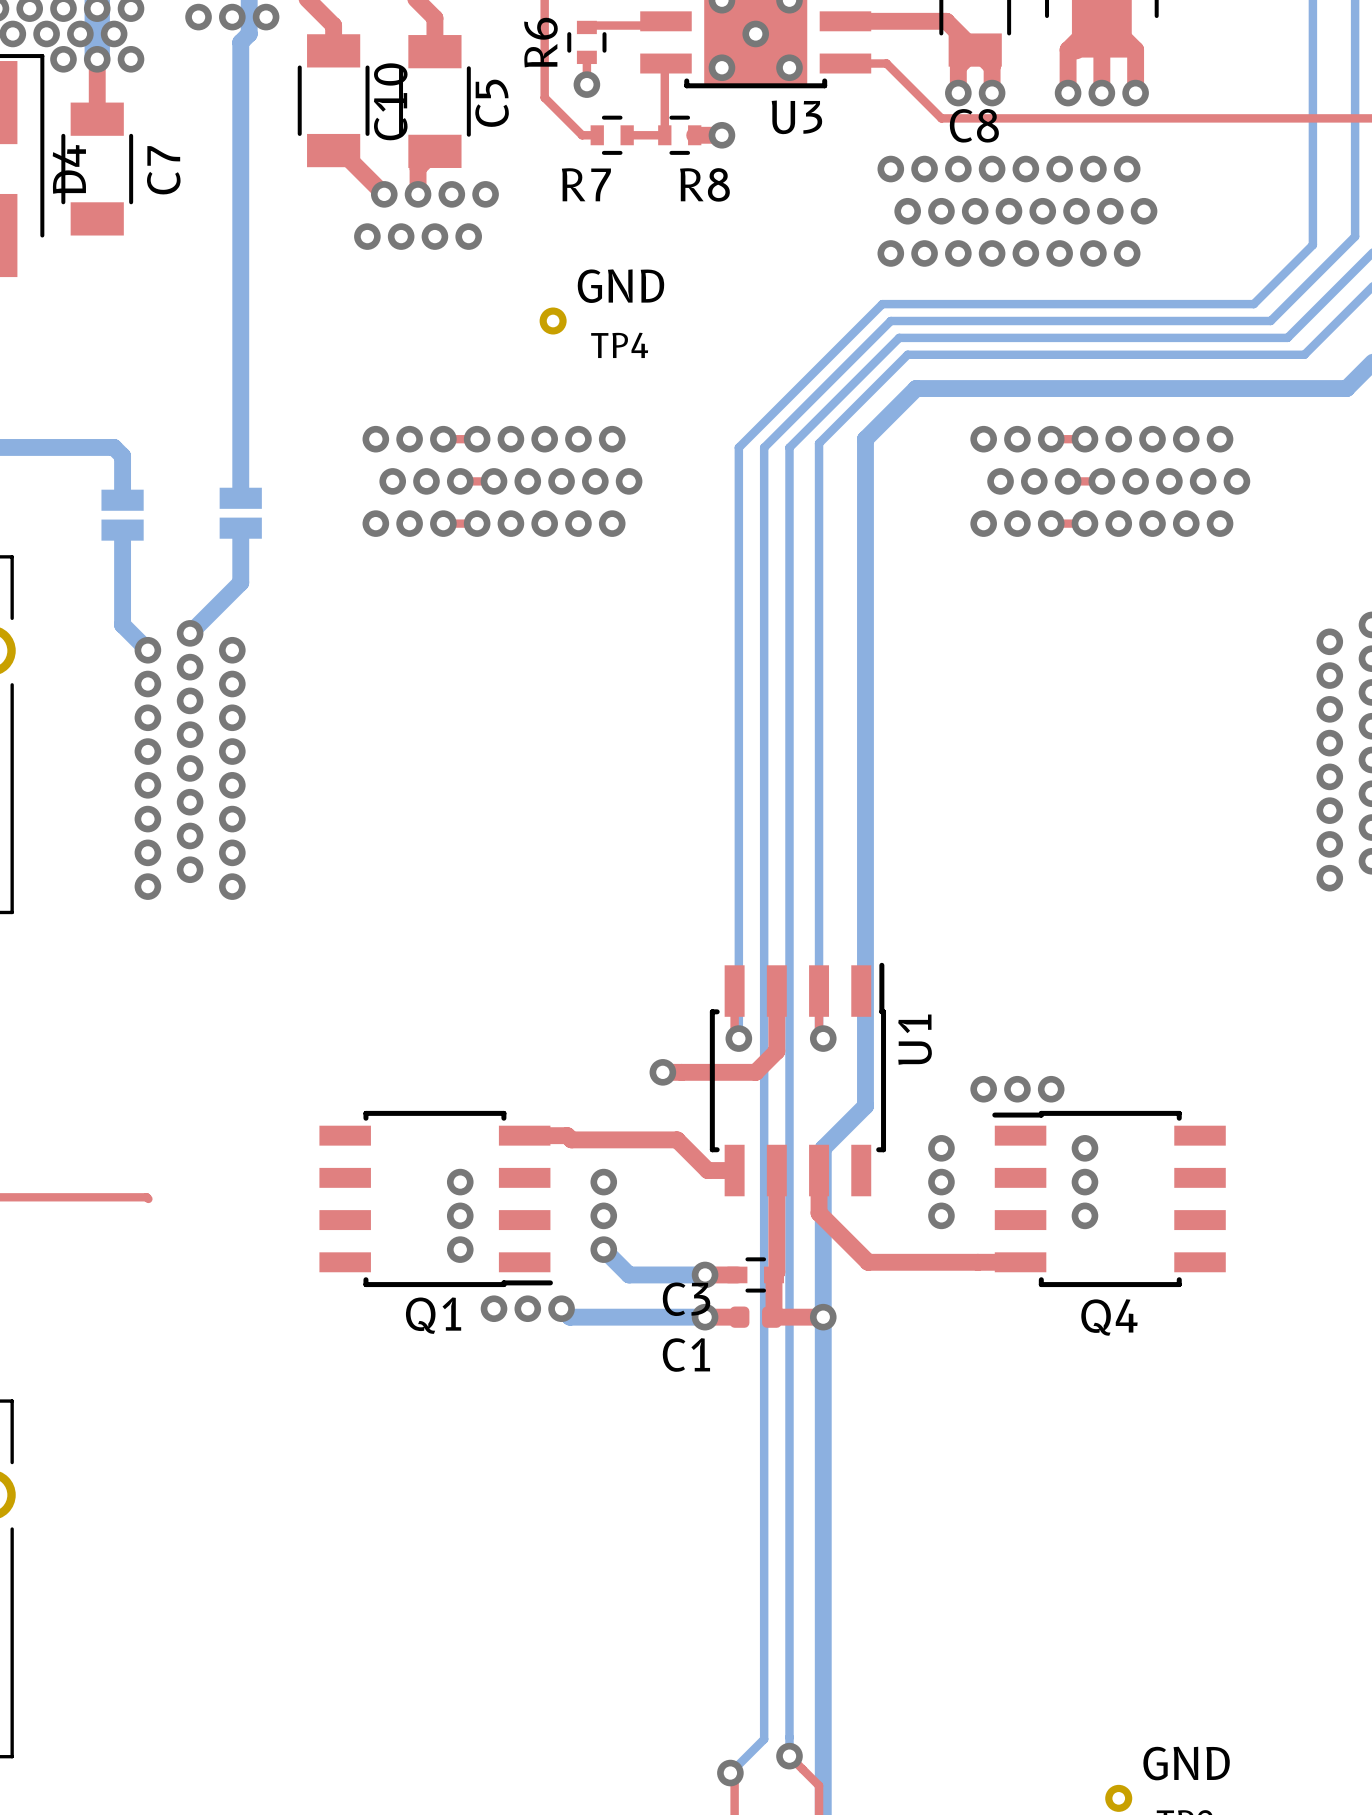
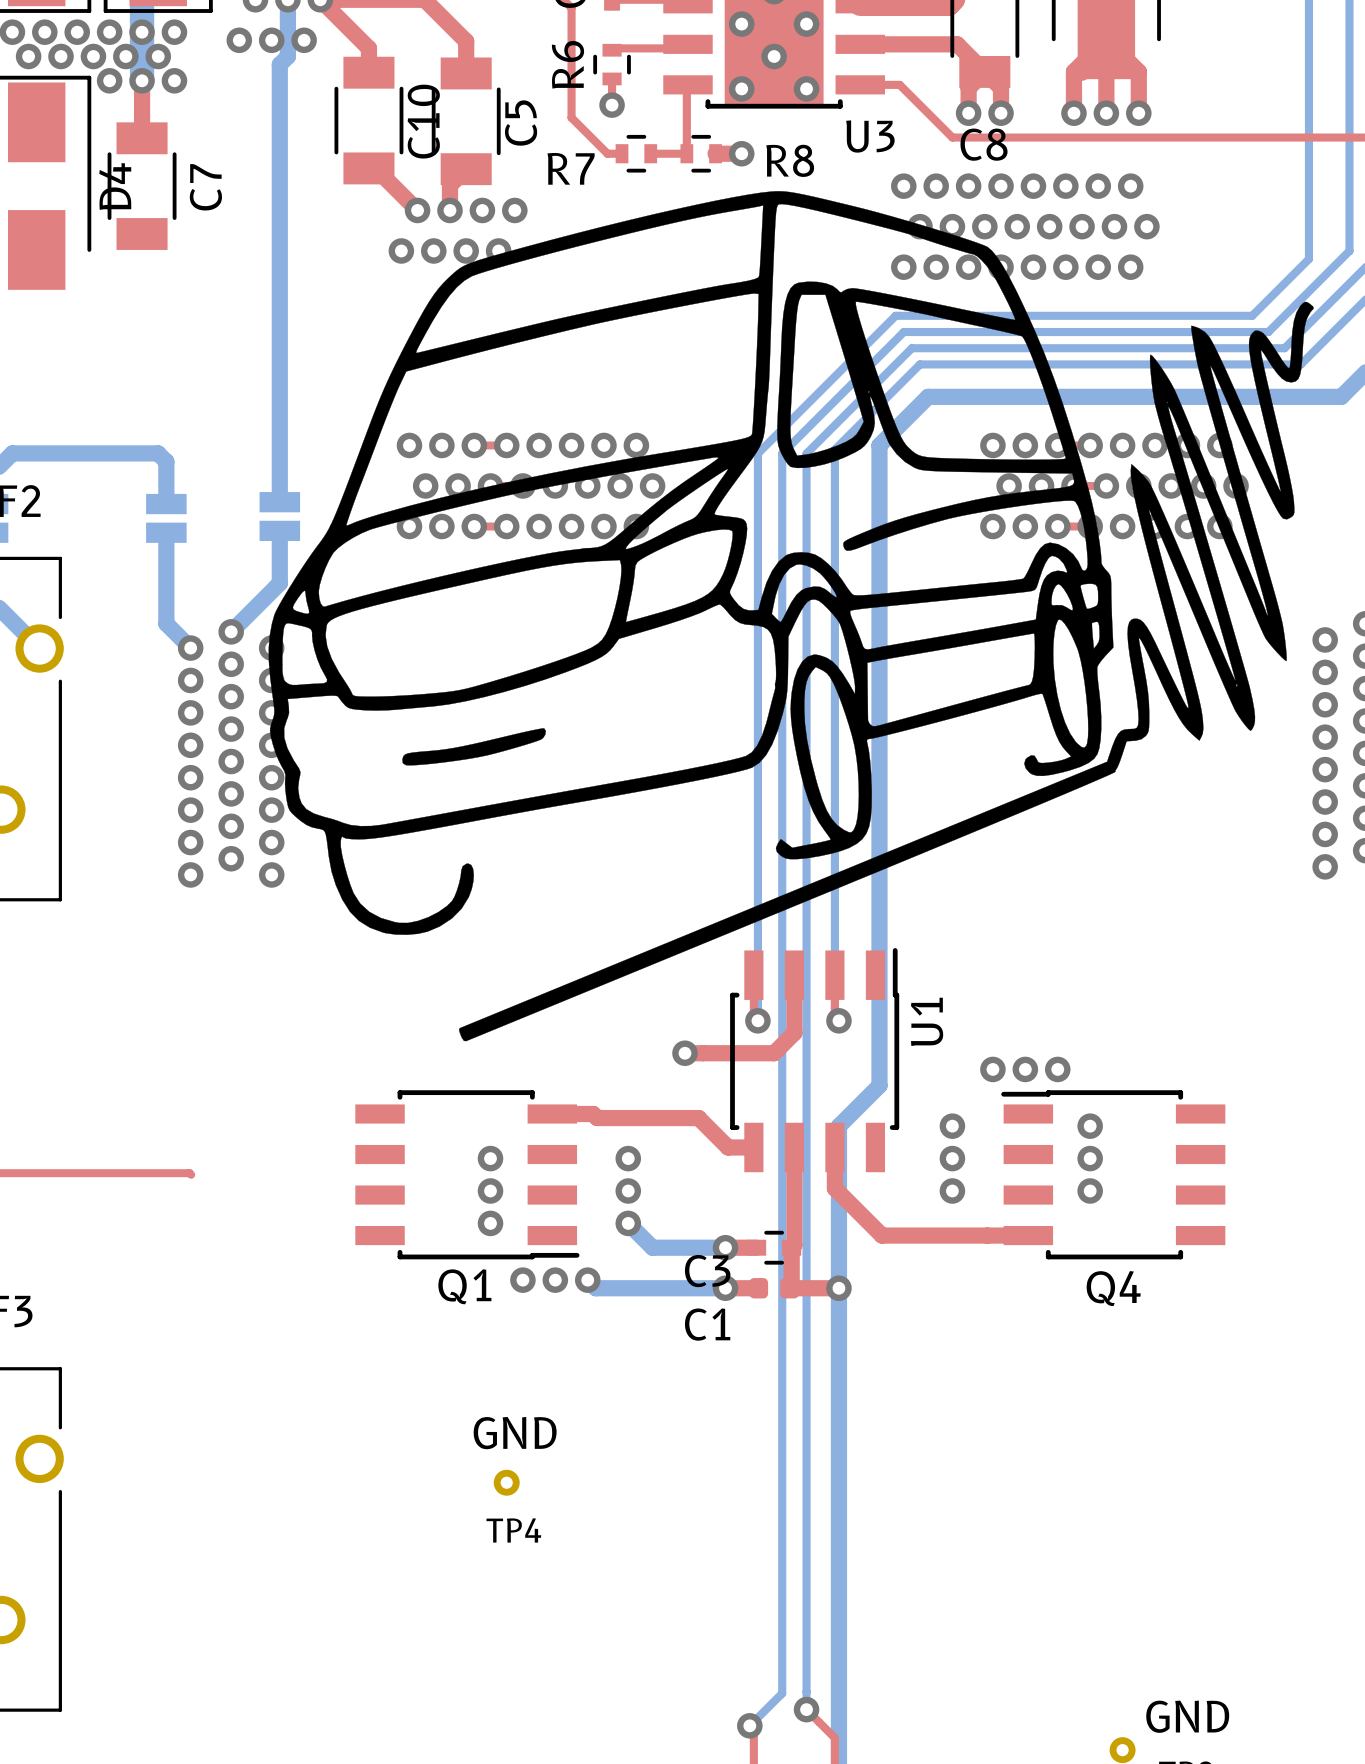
U3 name position: U3 (796, 117) -> U3 (870, 136)
drawing: none -> [268, 191, 1314, 1042]
R7 name position: R7 (586, 184) -> R7 (571, 168)
R8 name position: R8 (704, 184) -> R8 (790, 160)
text: GND (620, 286) -> none
TP4 position: (553, 321) -> (506, 1482)
TP4 name position: TP4 (619, 345) -> TP4 (513, 1530)
text: none -> GND (515, 1433)

